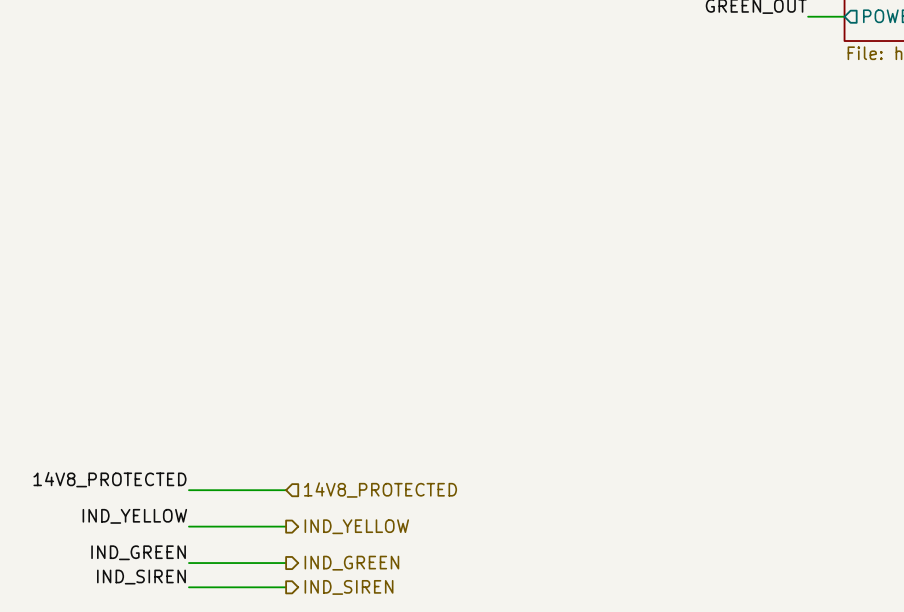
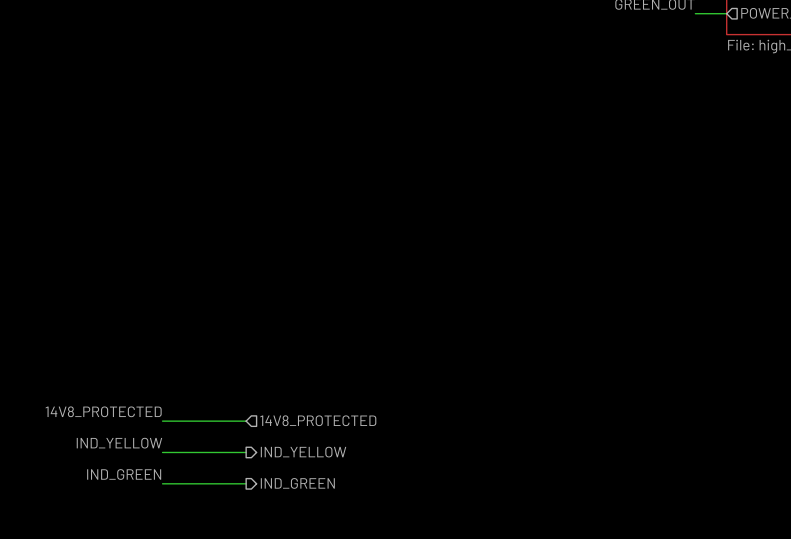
label: IND_SIREN (141, 577) -> none
wire: (188, 587) (286, 587) -> none
hierarchical label: IND_SIREN (349, 587) -> none

